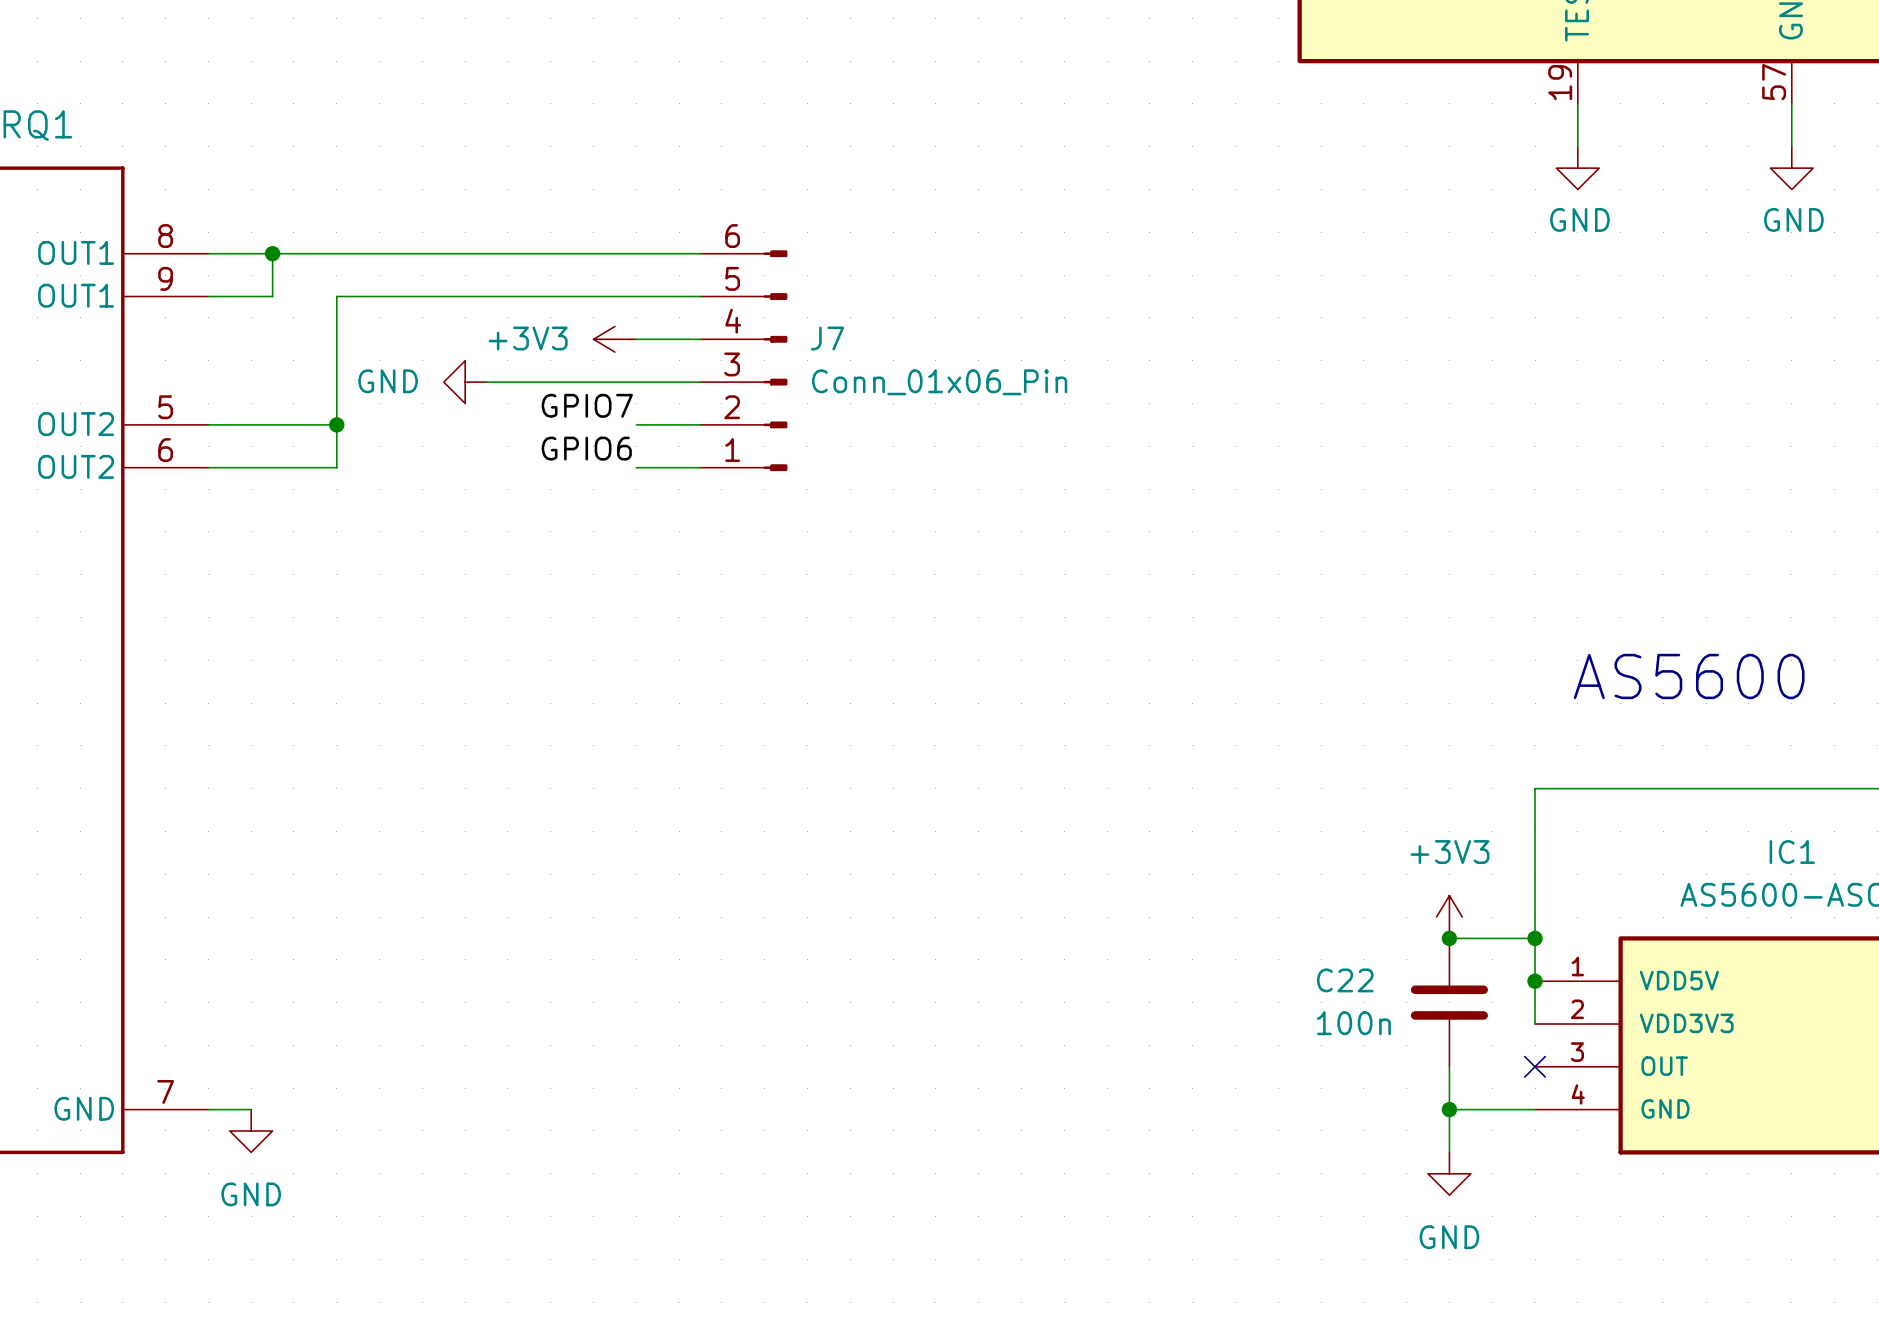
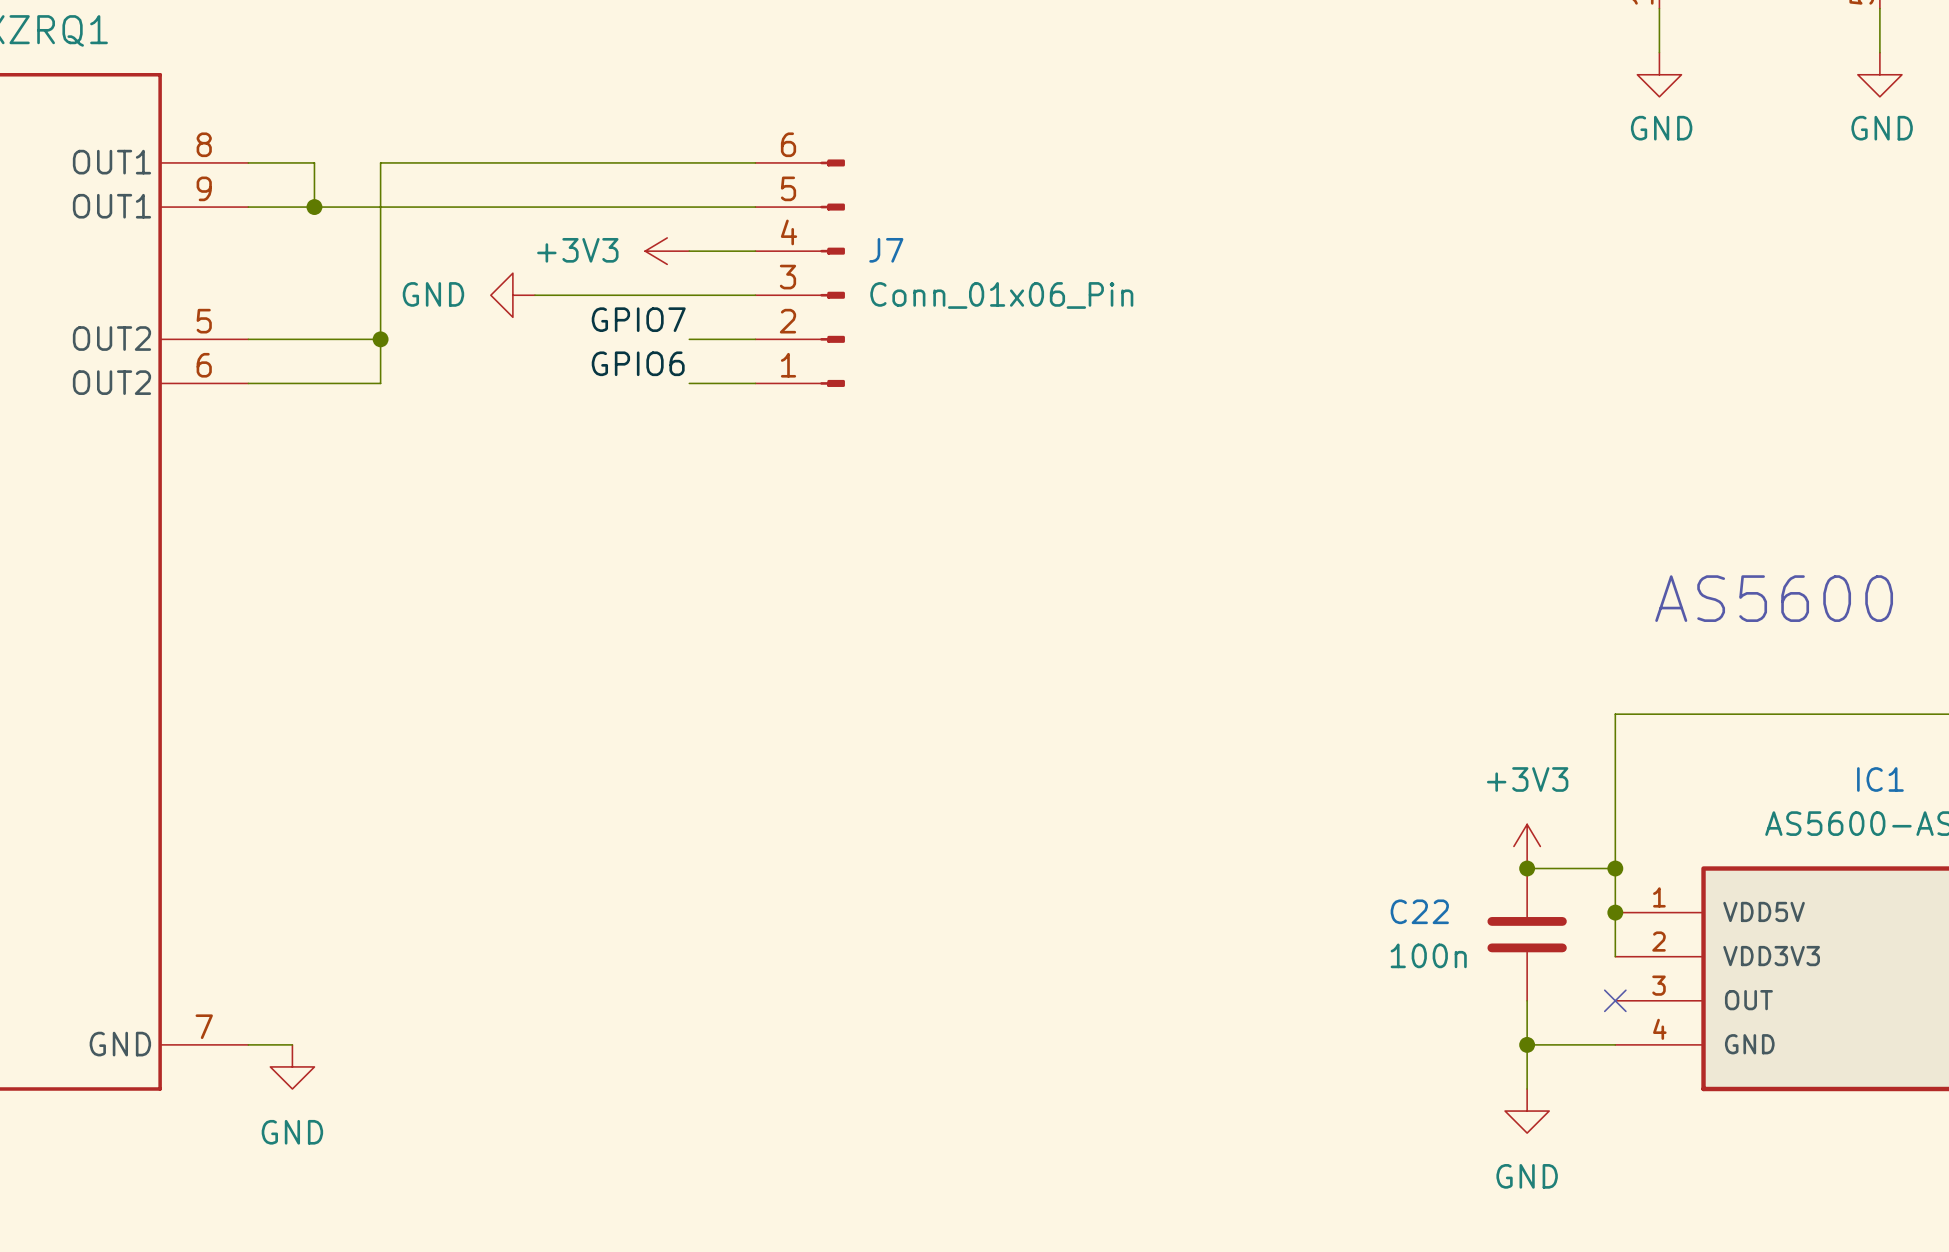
wire: (272, 253) (336, 253) -> (314, 207) (380, 207) (380, 162)
junction position: (272, 253) -> (314, 207)

